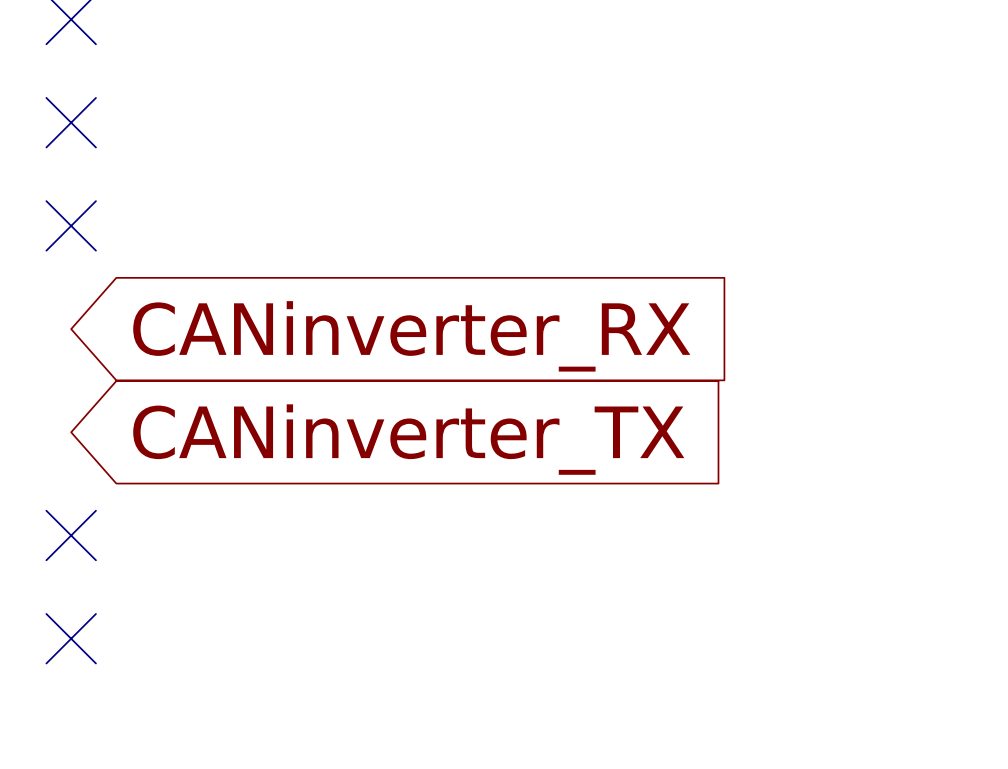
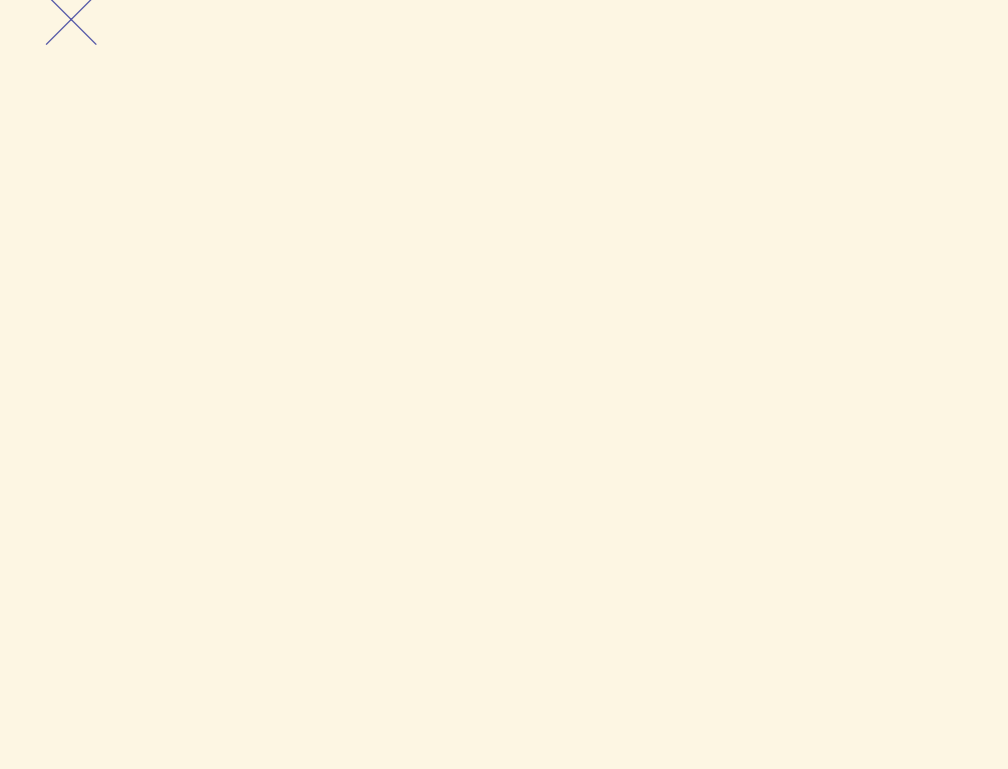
no-connect mark: (71, 122) -> none
no-connect mark: (71, 225) -> none
global label: CANinverter_RX (411, 336) -> none
global label: CANinverter_TX (408, 439) -> none
no-connect mark: (71, 535) -> none
no-connect mark: (71, 638) -> none

